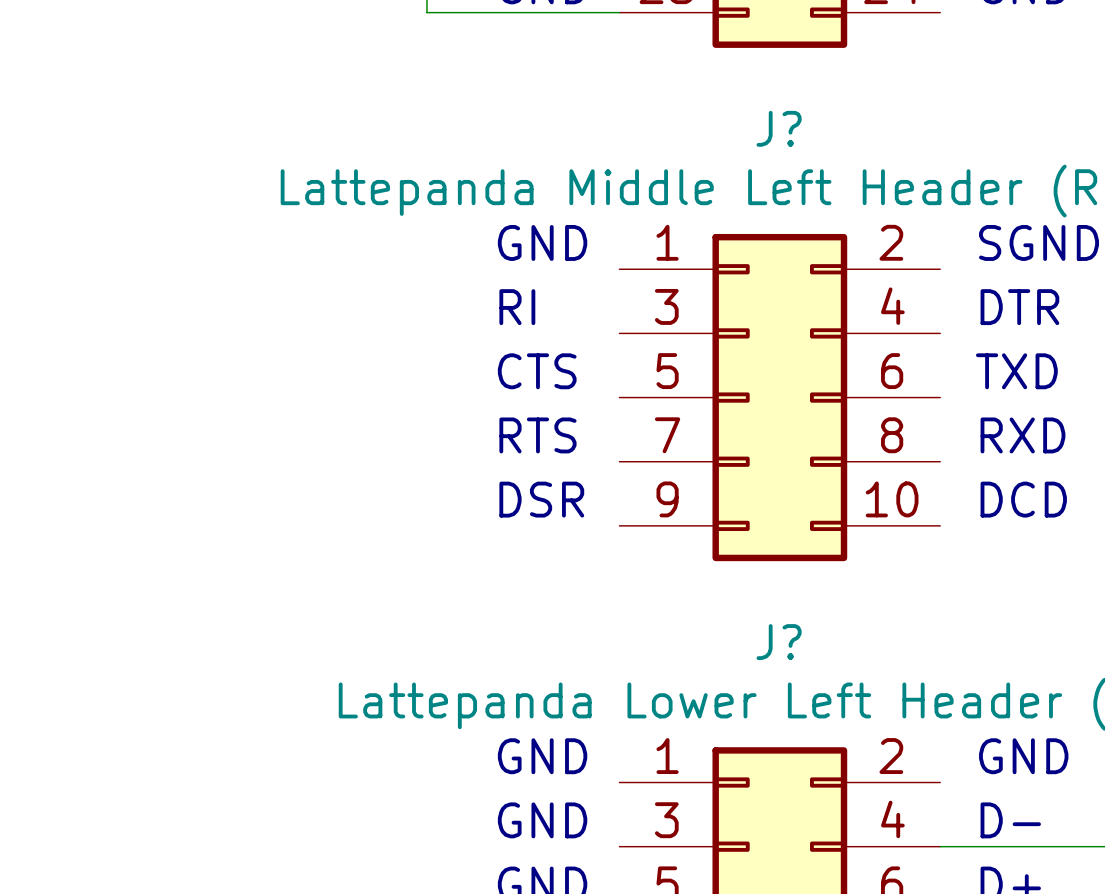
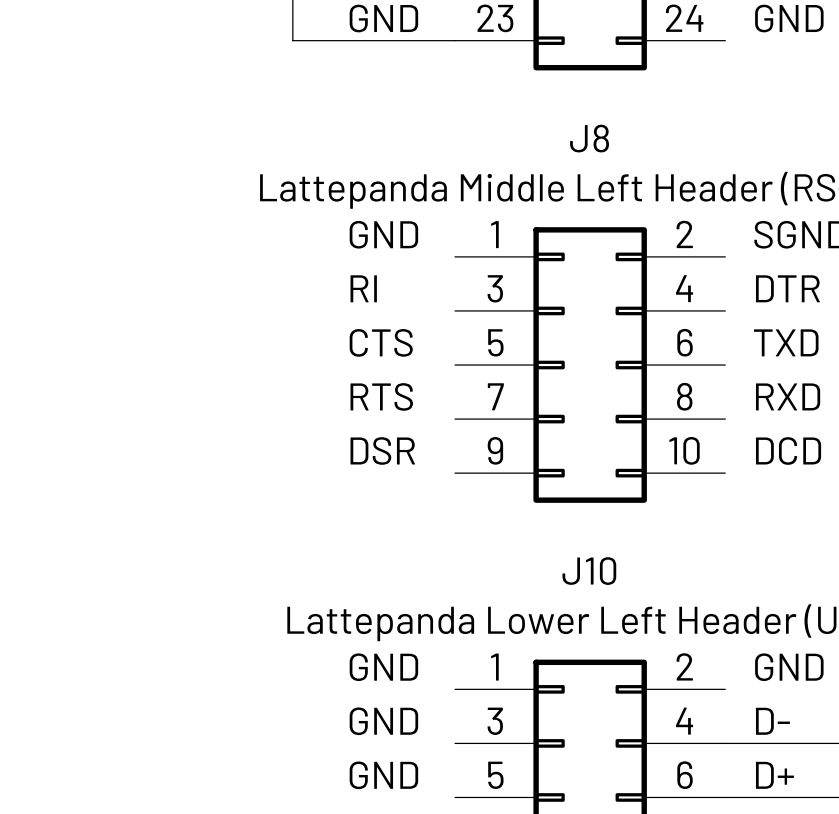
J? name: J? (779, 128) -> J8 (589, 138)
J? name: J? (779, 642) -> J10 (589, 571)

